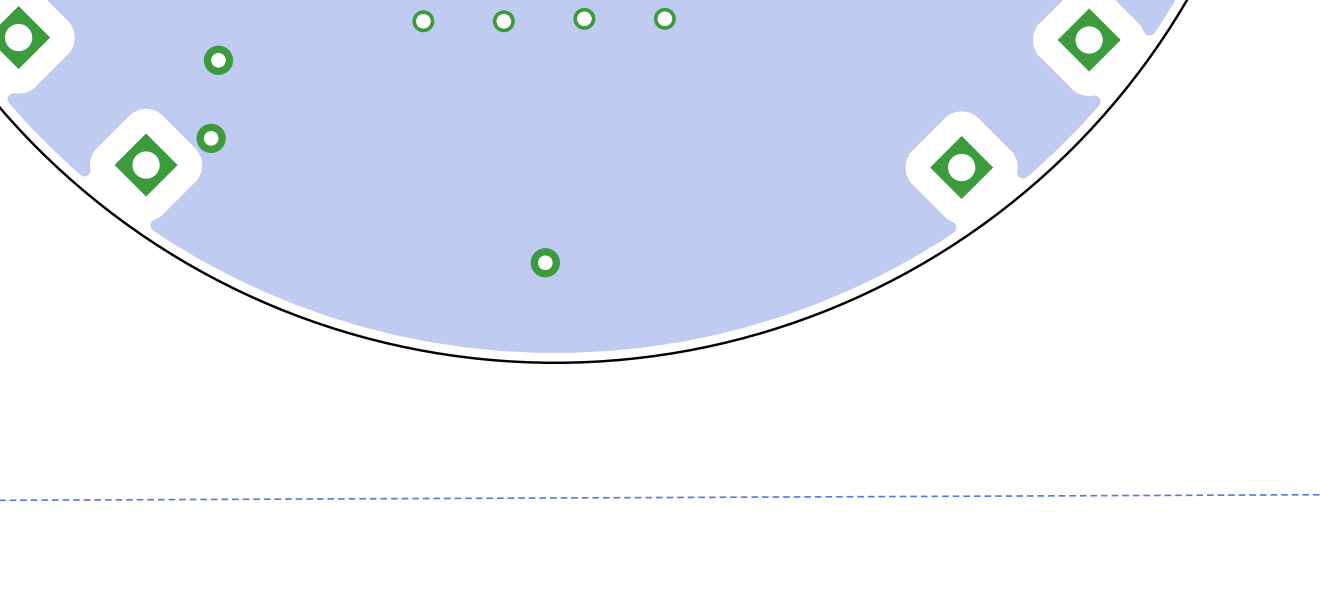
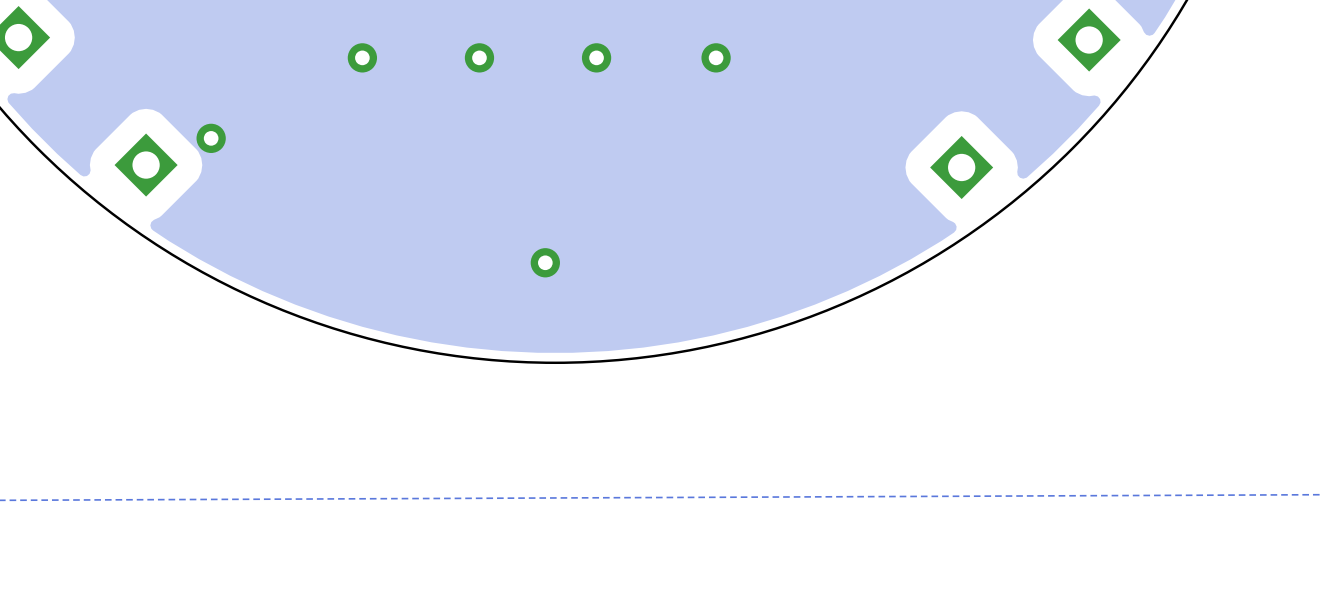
via: (584, 18) -> none
via: (664, 18) -> none
via: (423, 21) -> none
via: (503, 21) -> none
via: none -> (362, 57)
via: none -> (479, 57)
via: none -> (596, 57)
via: none -> (716, 57)
via: (218, 60) -> none

